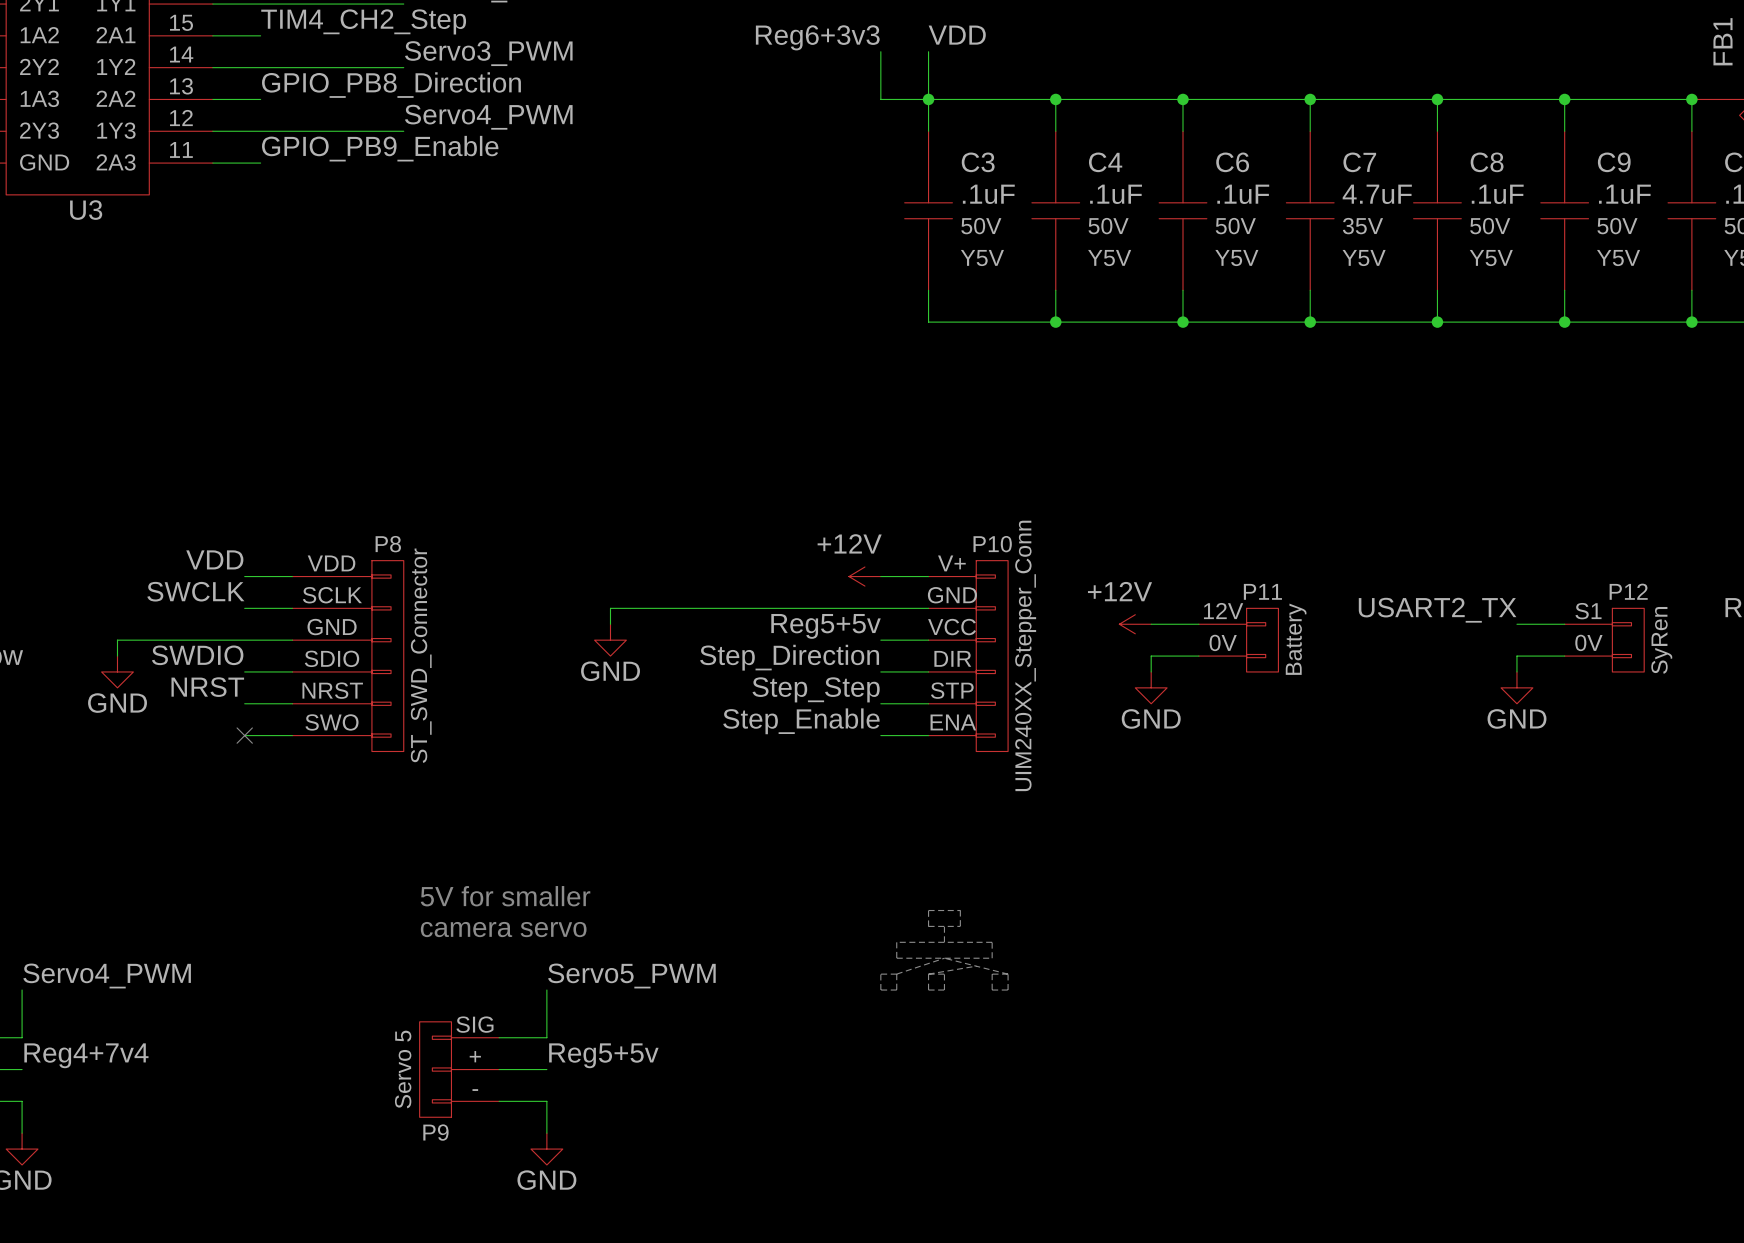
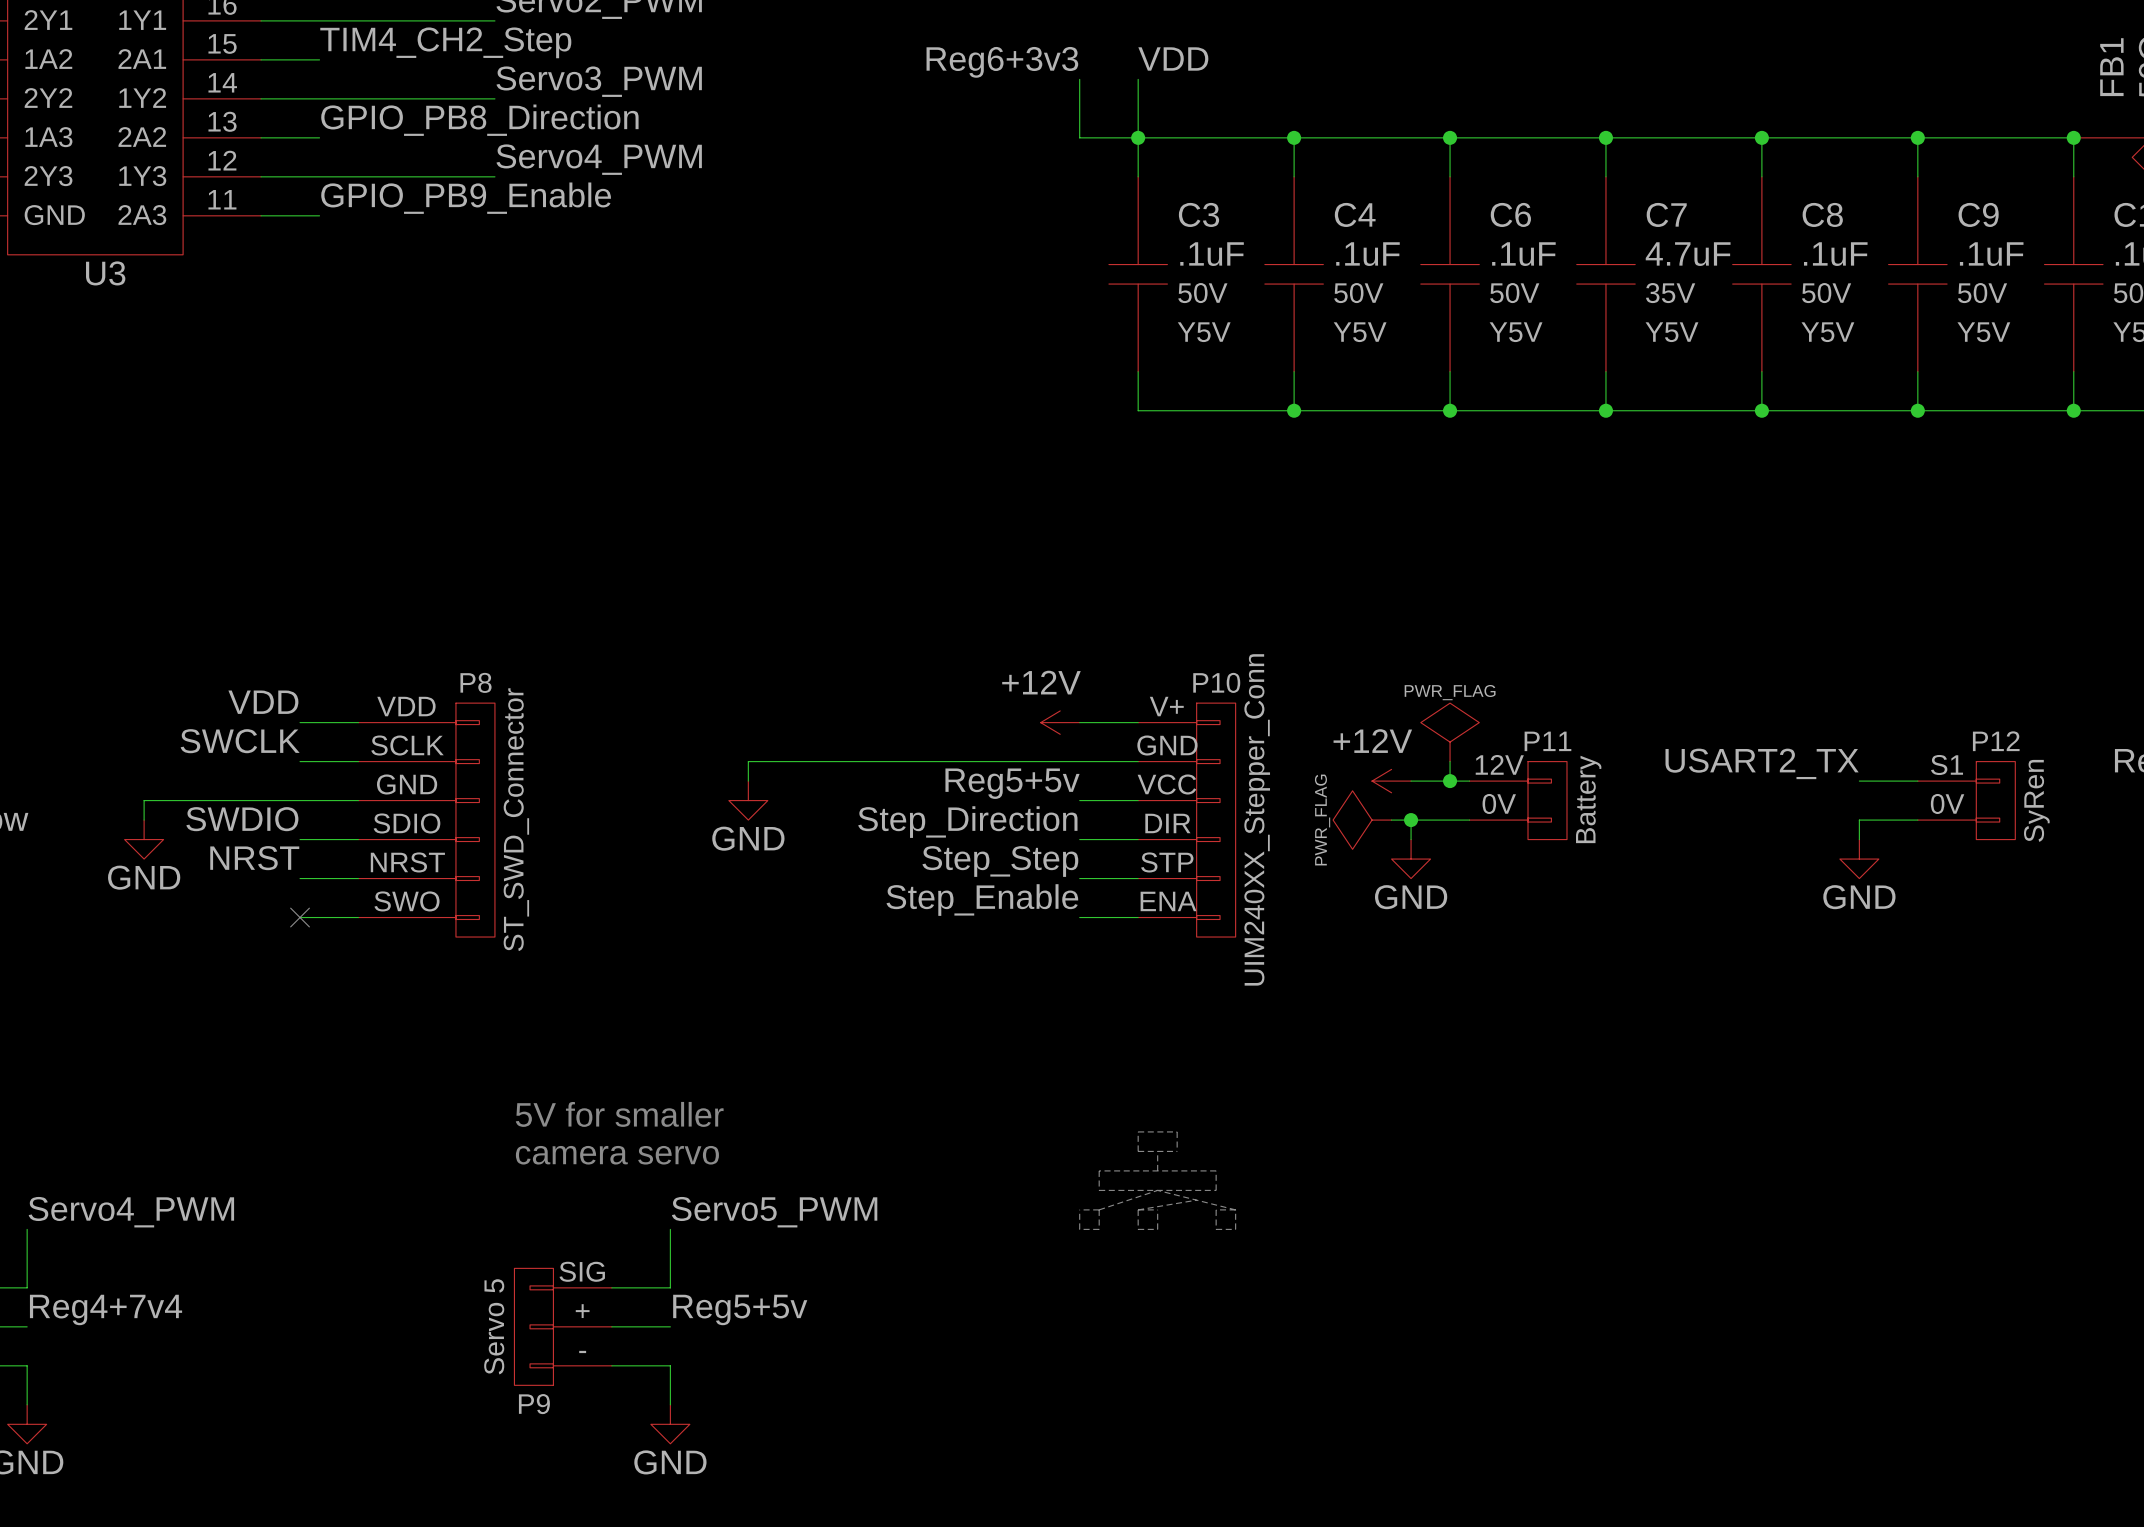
power symbol: none -> PWR_FLAG (1450, 732)
wire: none -> (1450, 761) (1450, 781)
junction: none -> (1450, 781)
power symbol: none -> PWR_FLAG (1362, 820)
wire: none -> (1391, 820) (1411, 820)
junction: none -> (1411, 820)

